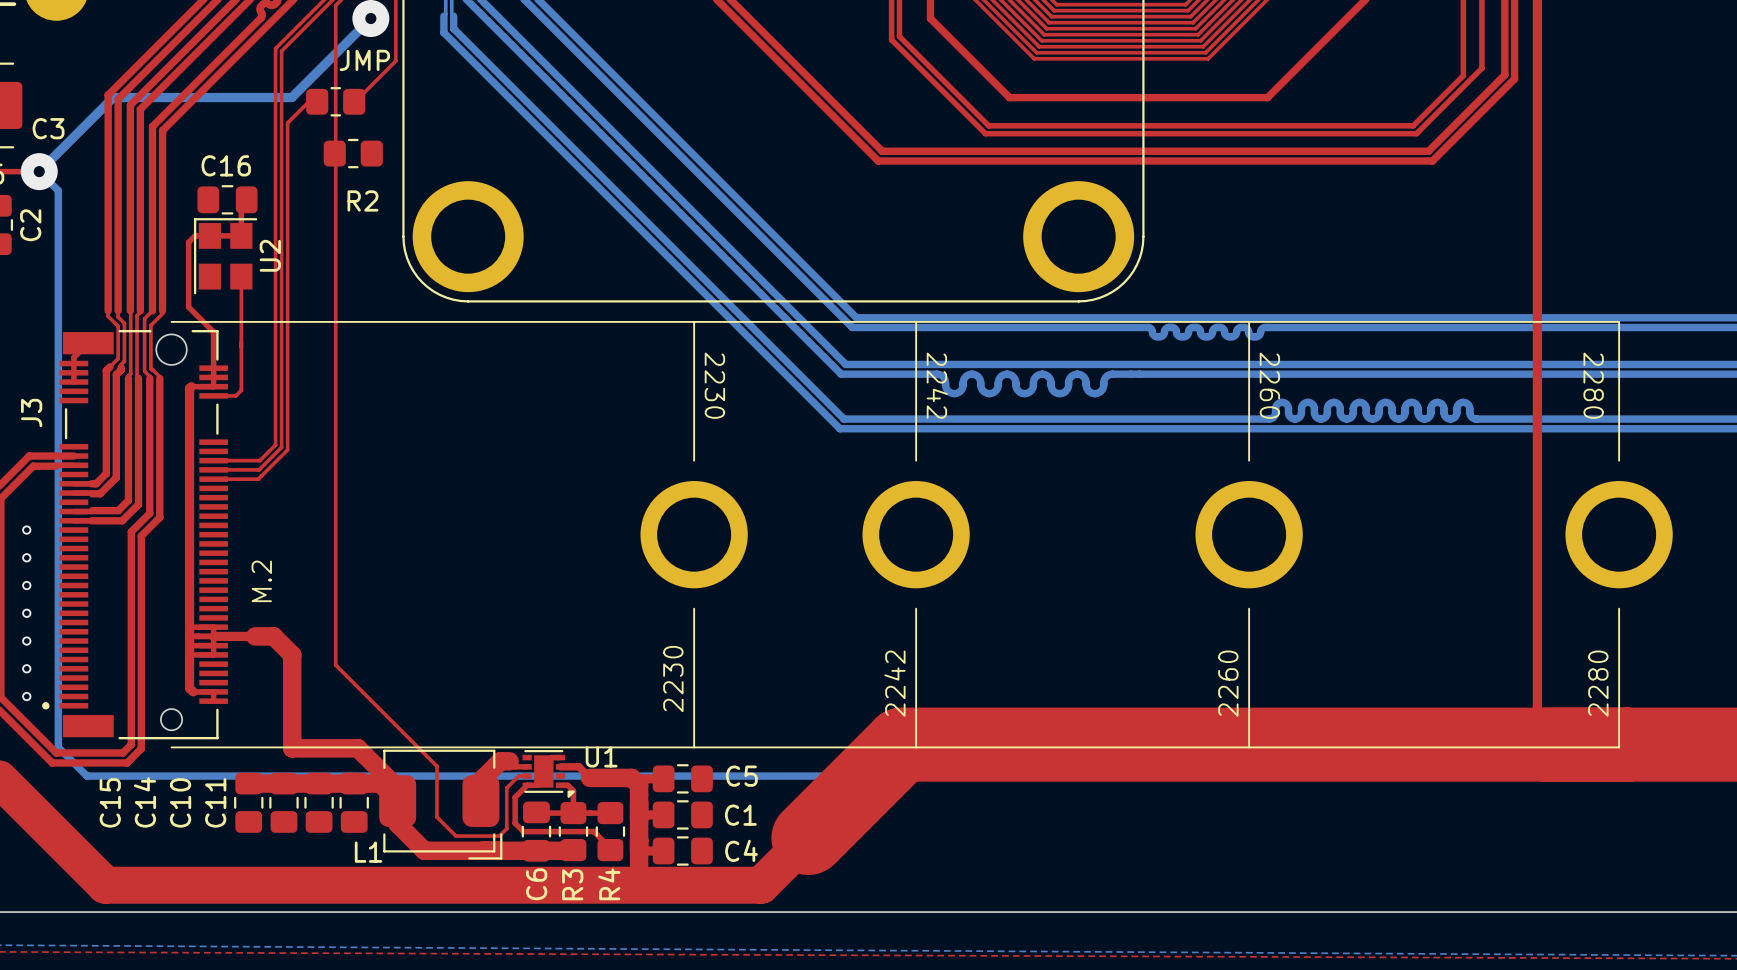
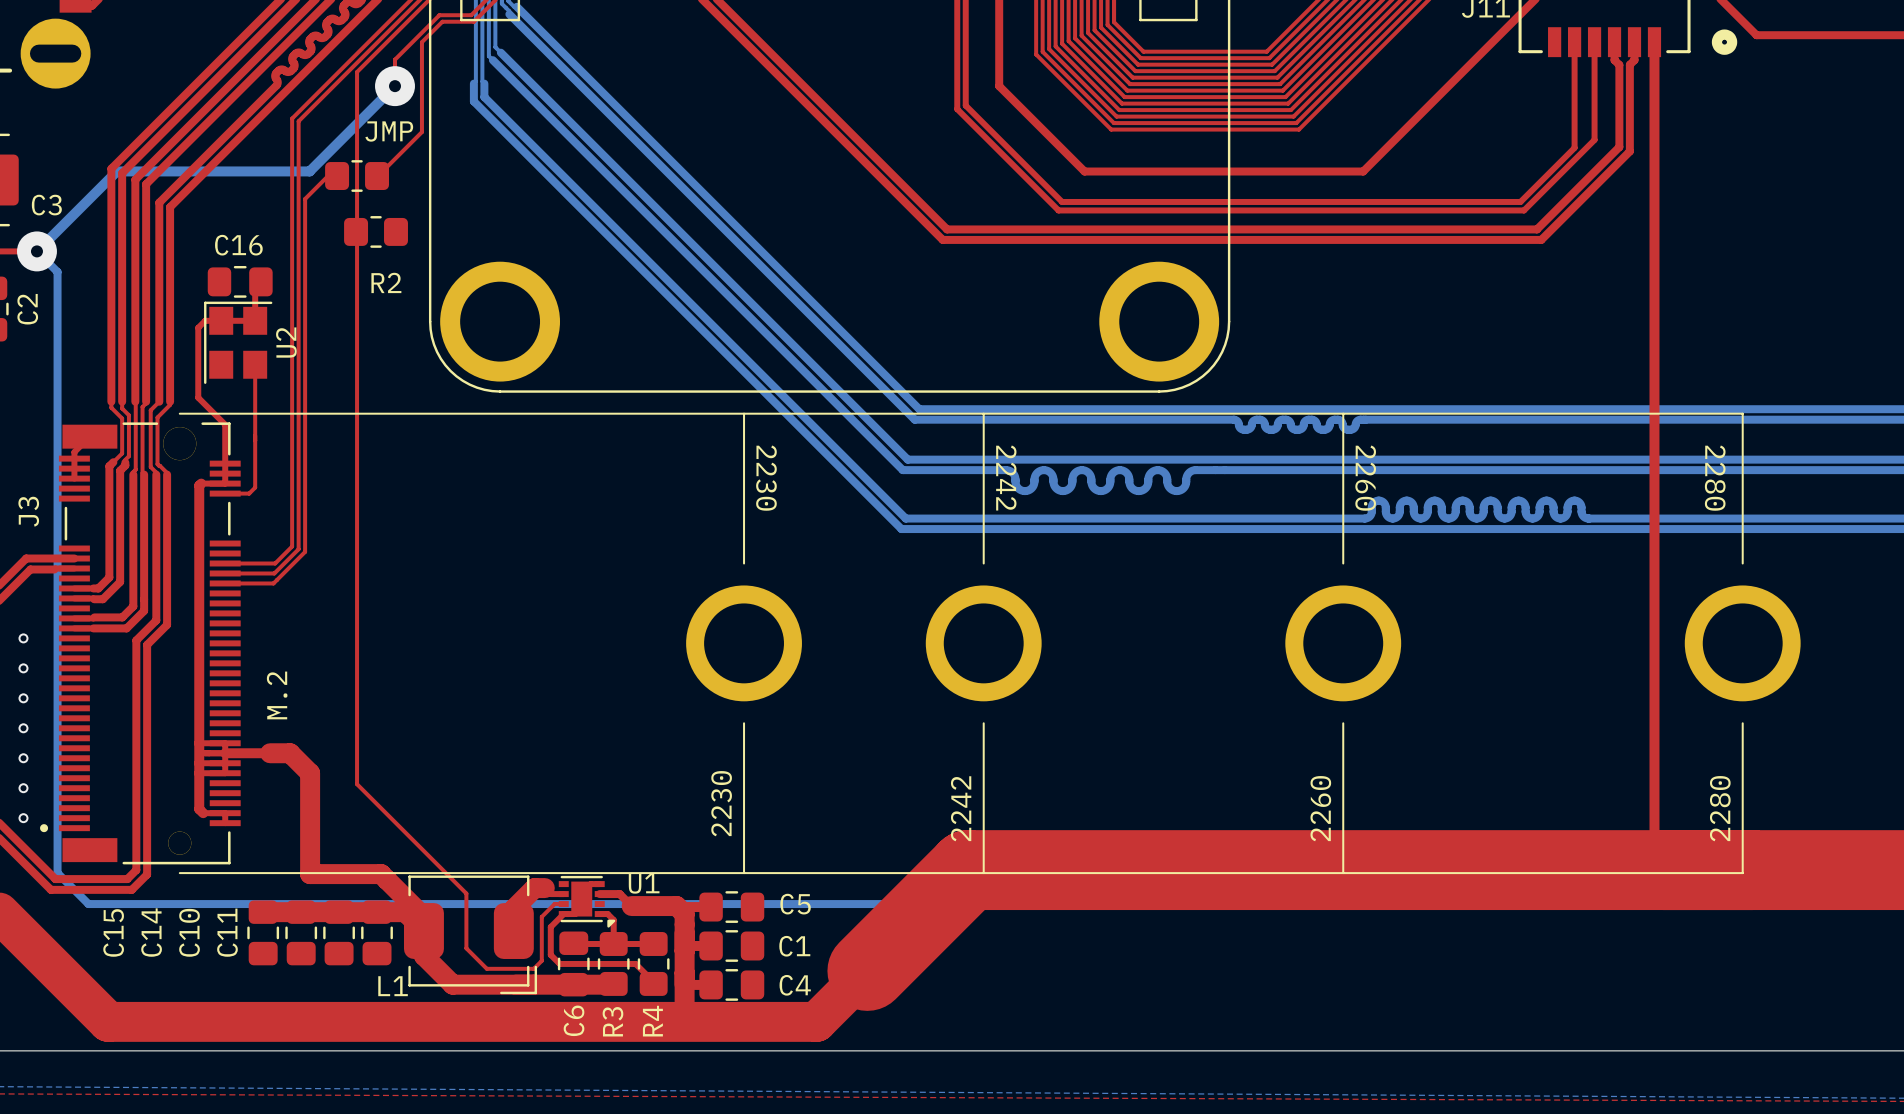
J3 footprint: [42, 320, 1673, 749] -> [40, 412, 1801, 875]

